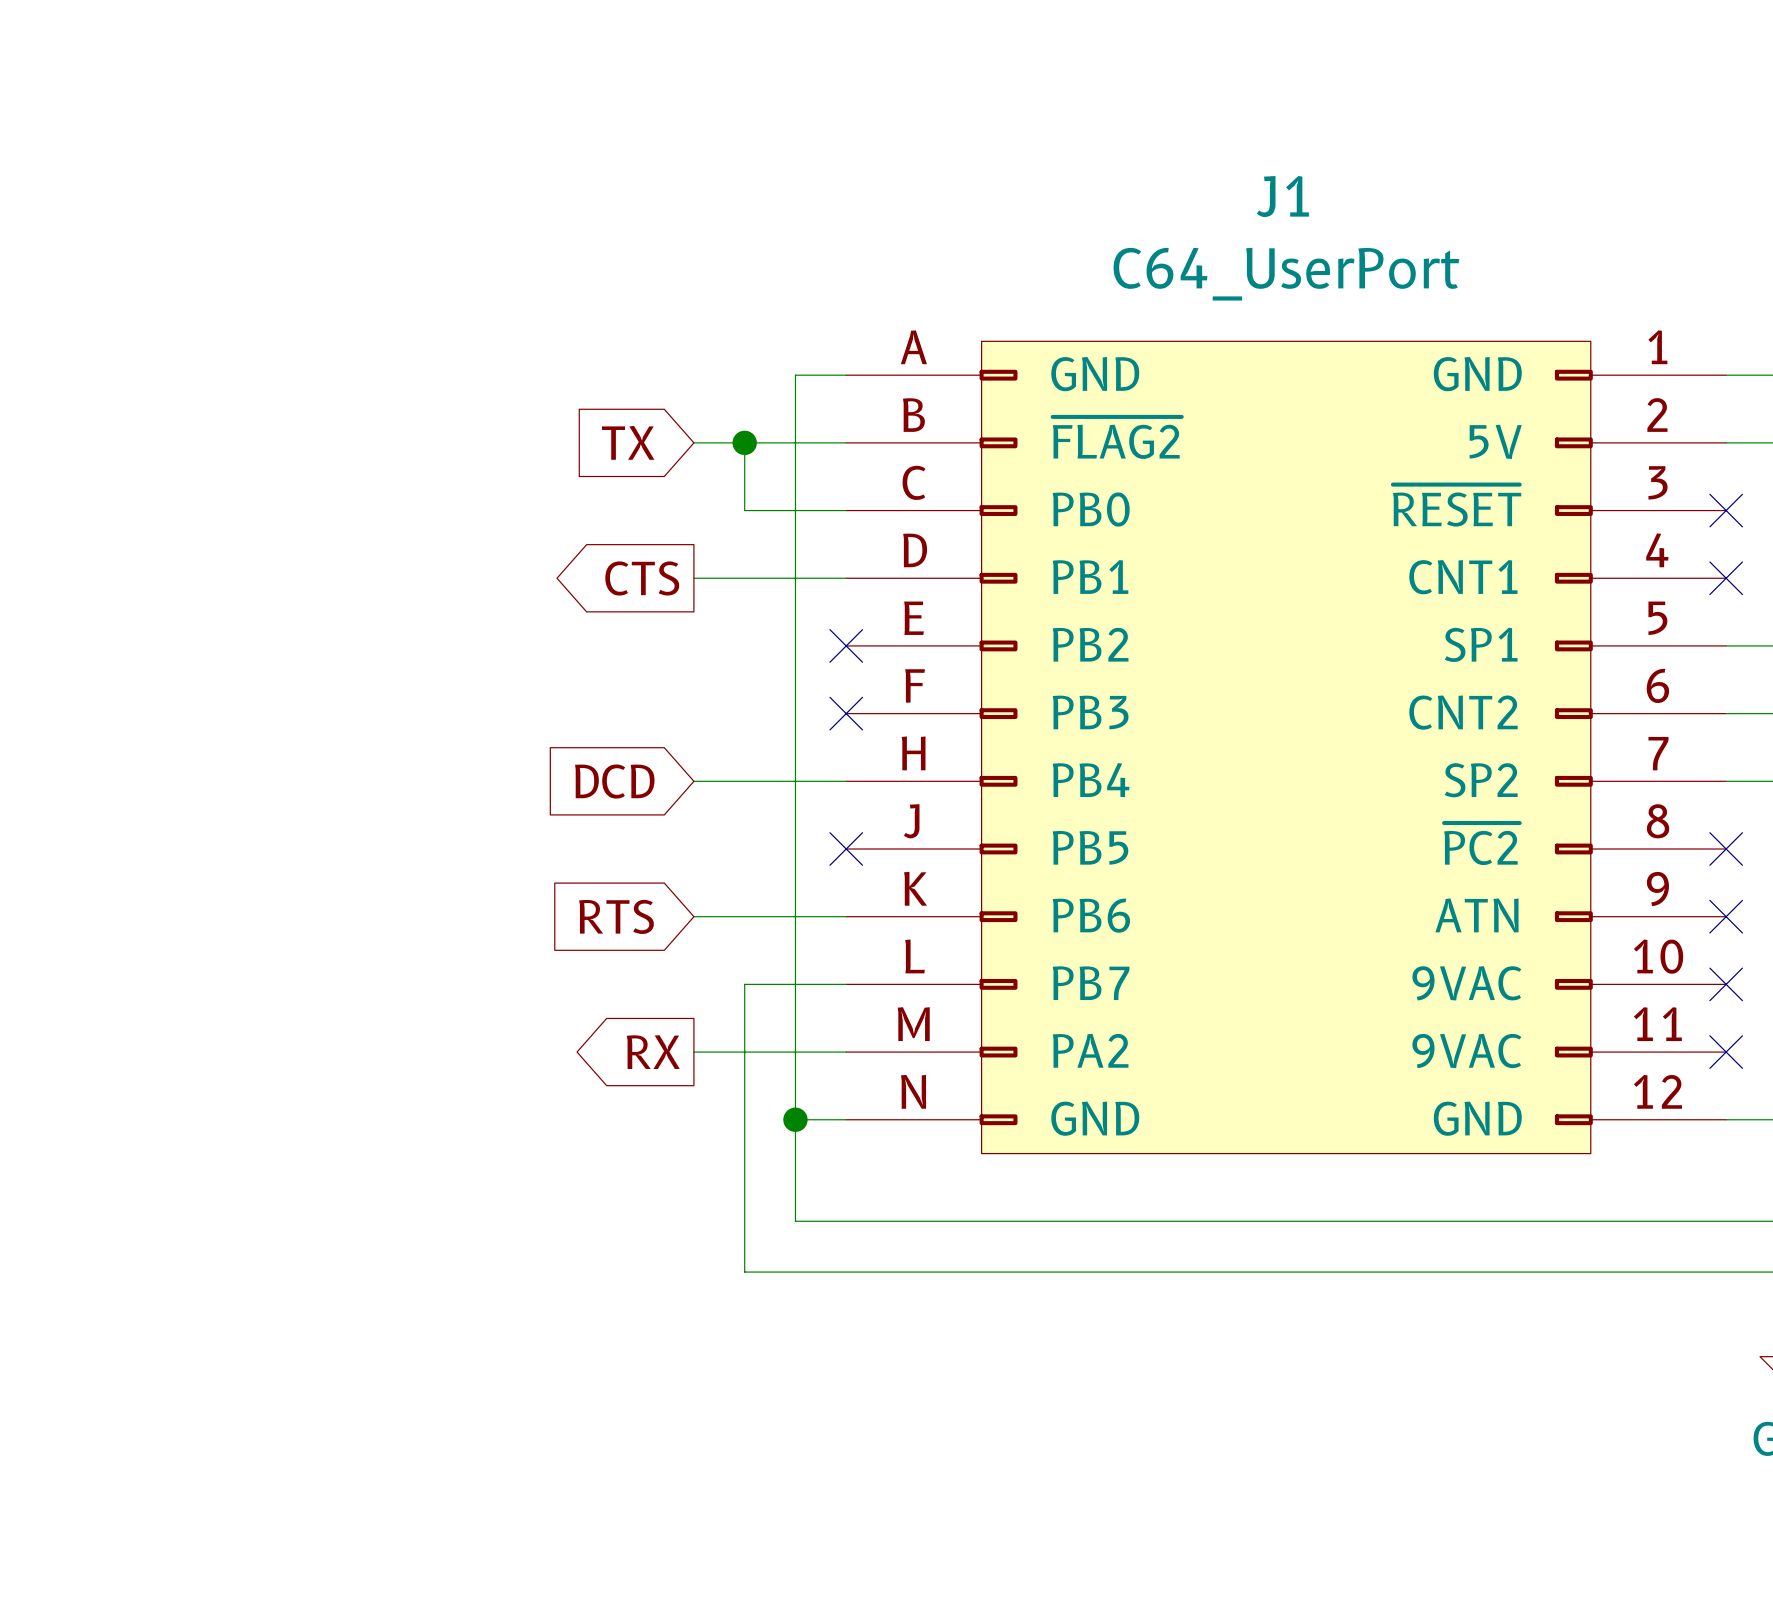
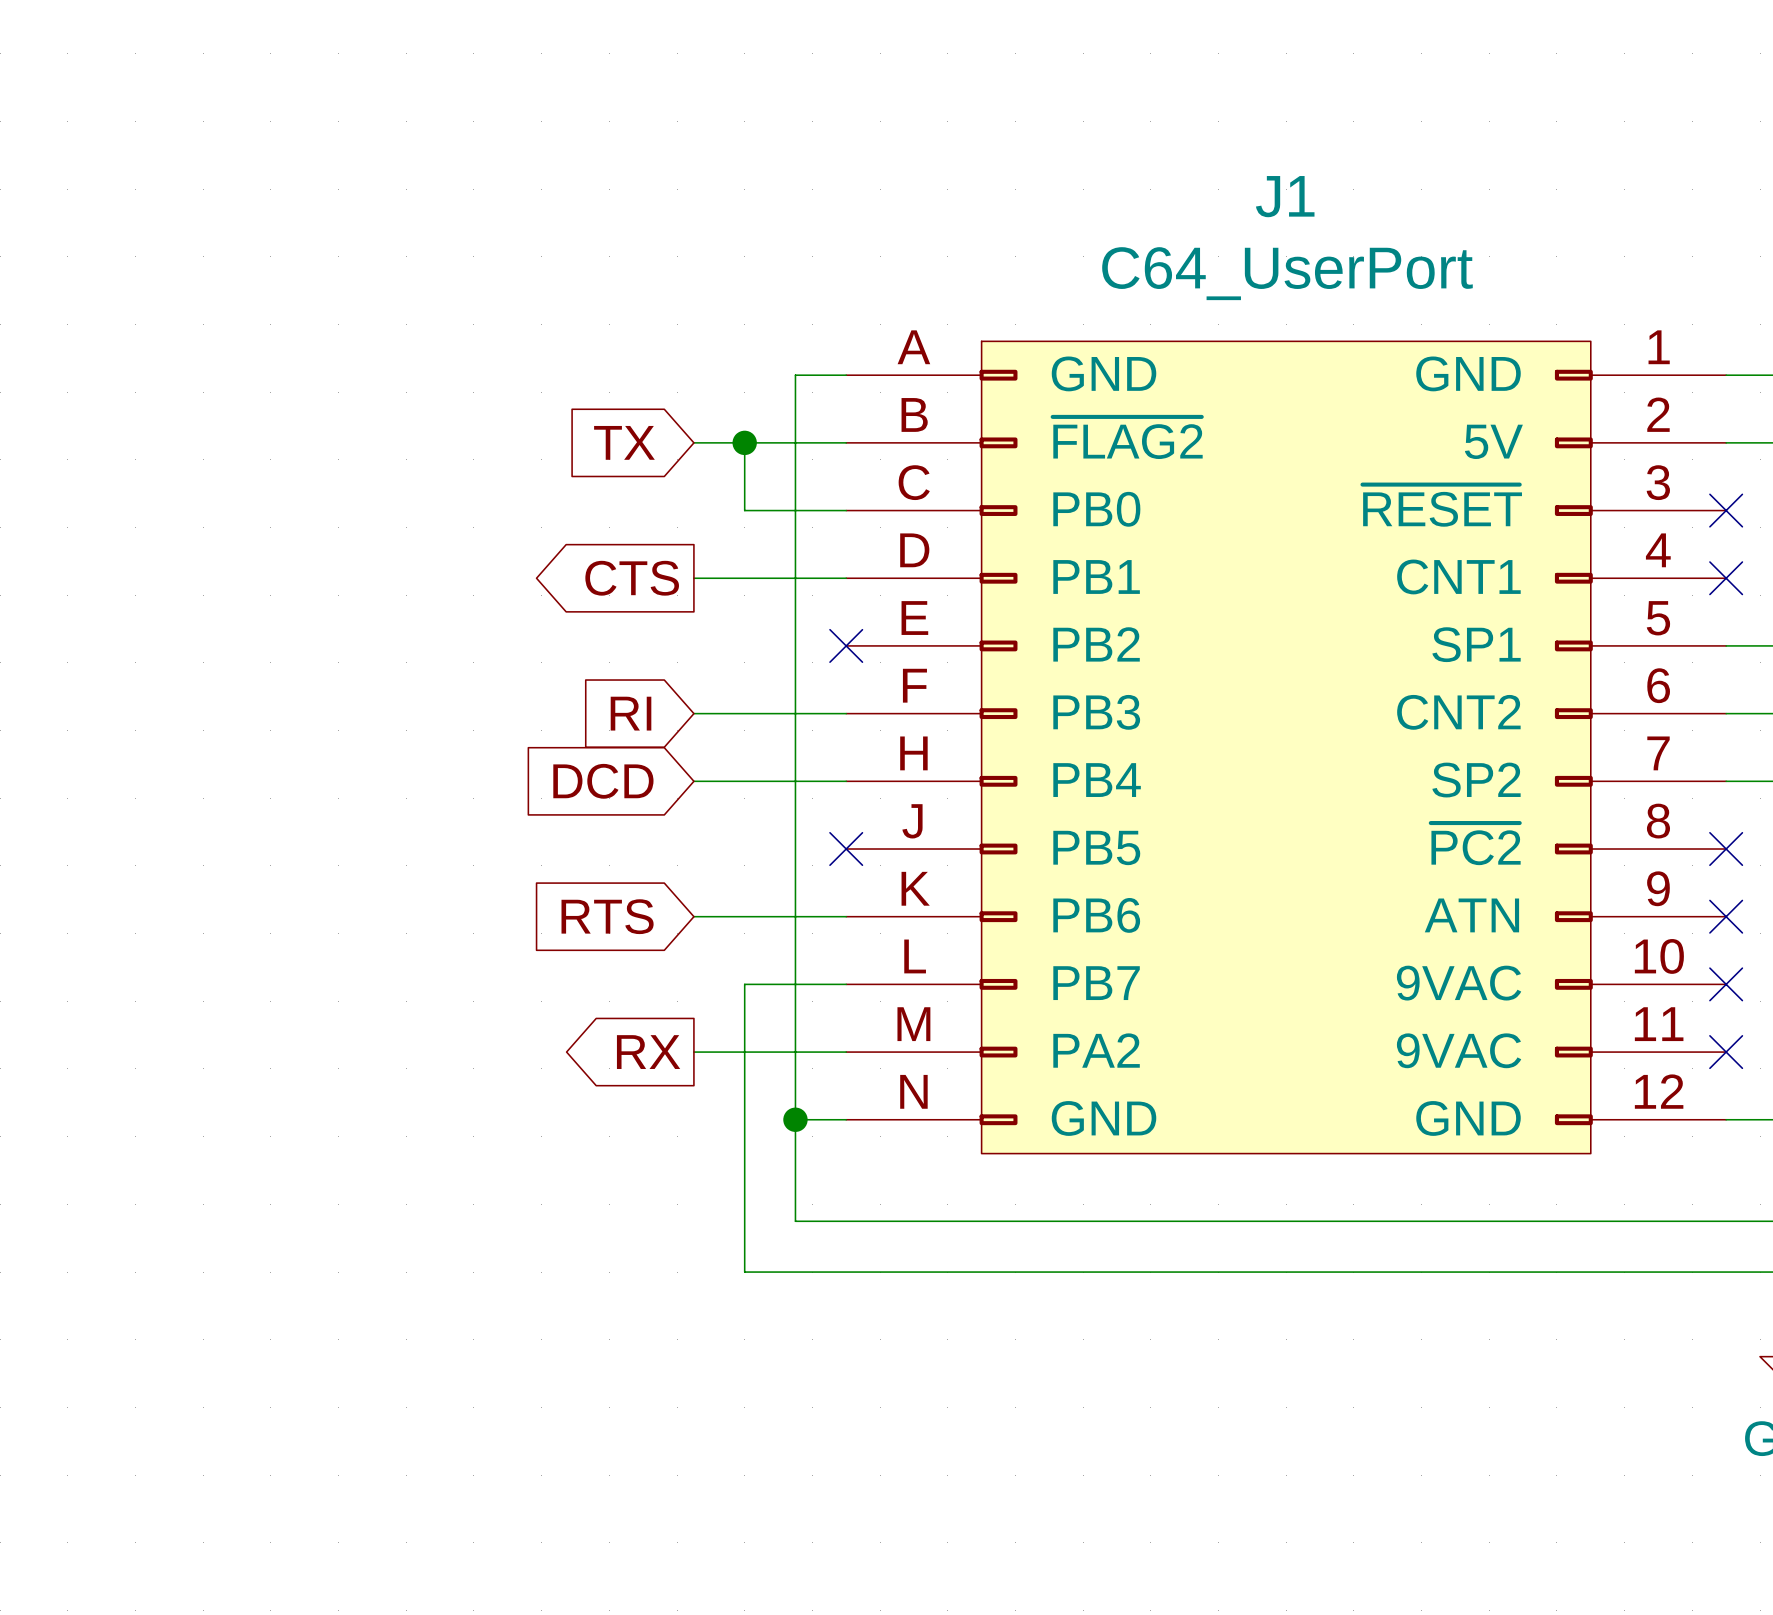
global label: none -> RI (631, 713)
wire: none -> (693, 713) (846, 713)
no-connect mark: (846, 713) -> none

